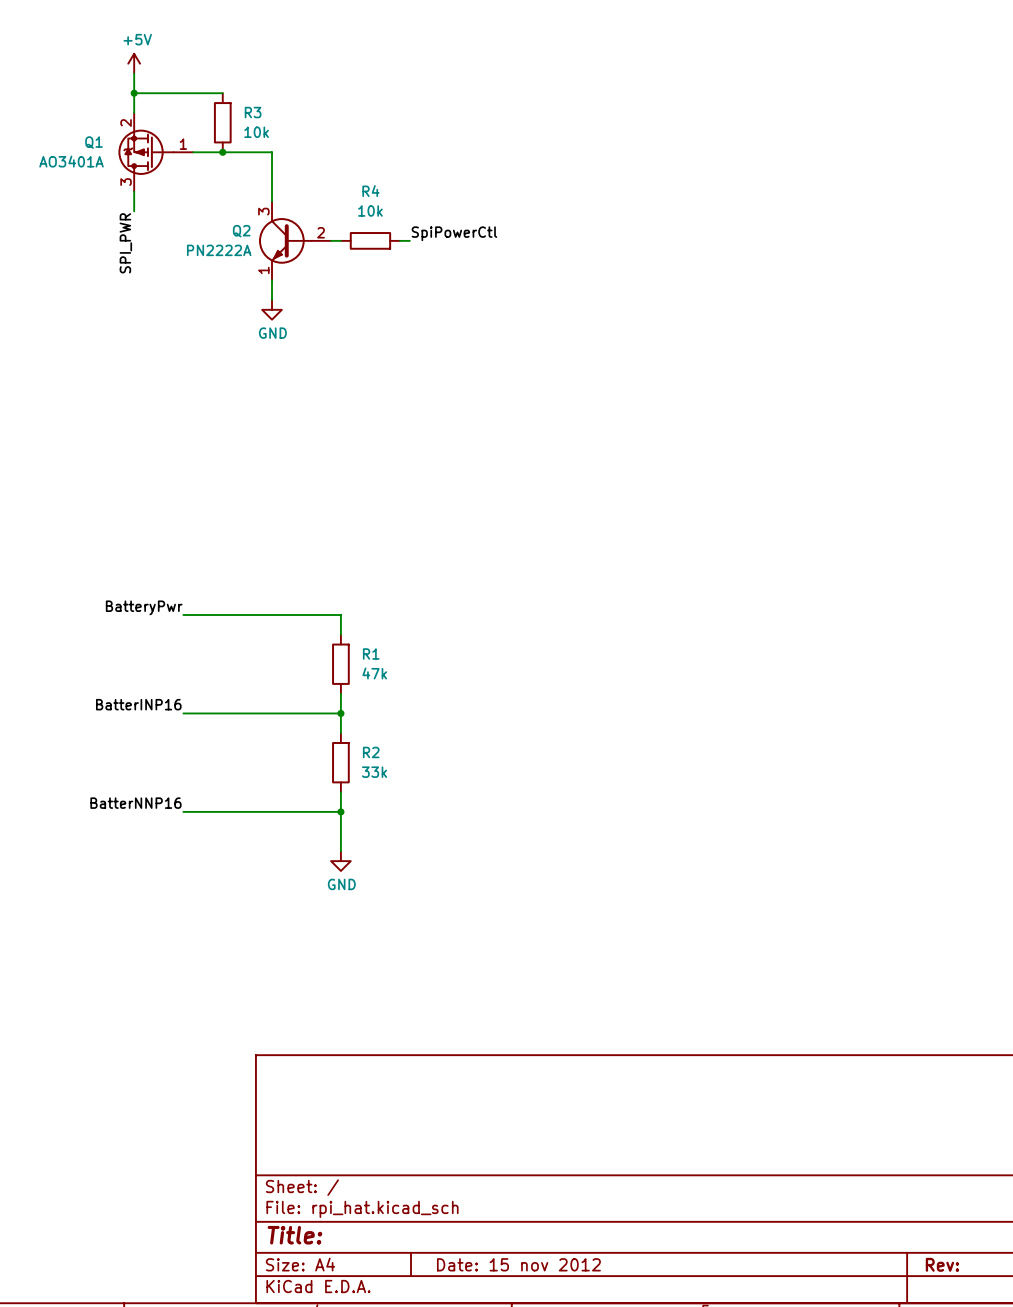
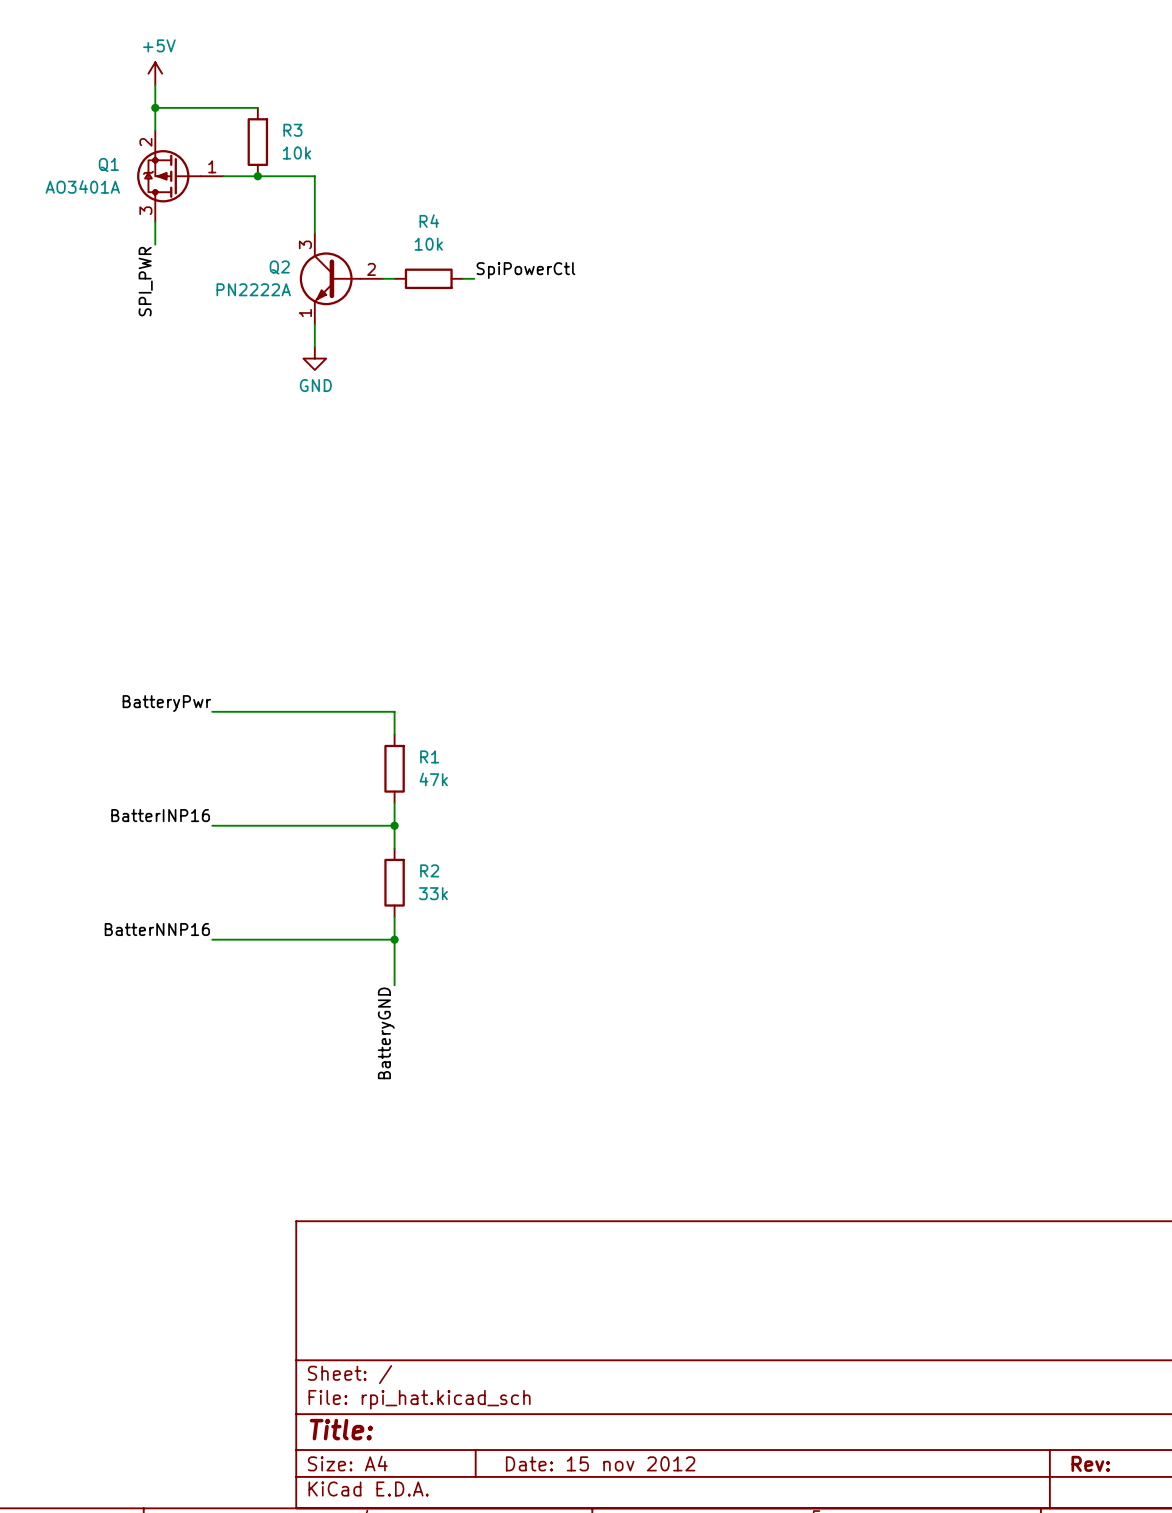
power symbol: GND (340, 861) -> none
label: none -> BatteryGND (386, 1033)

